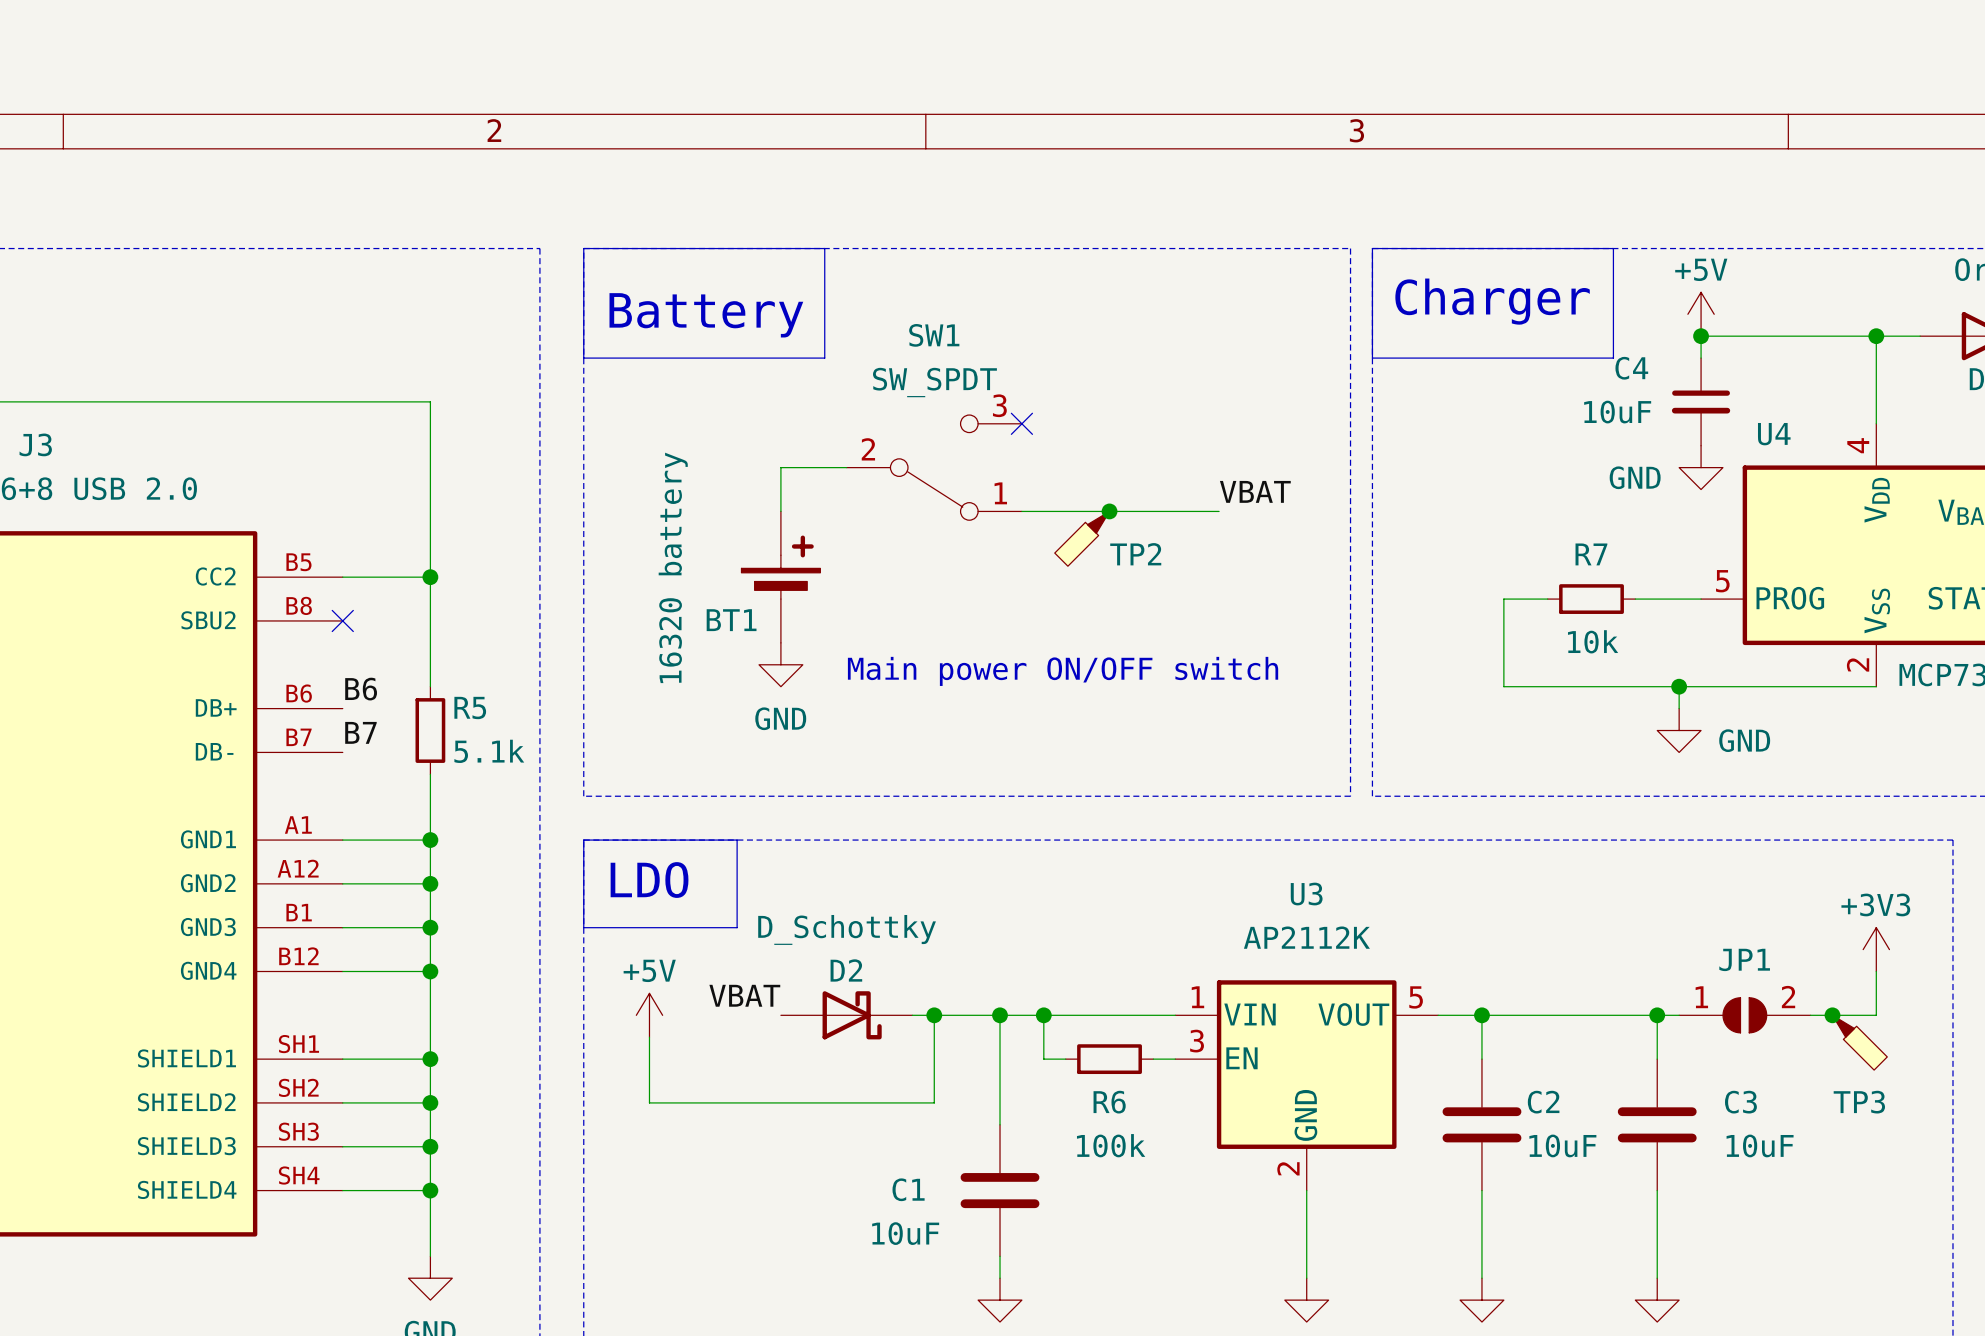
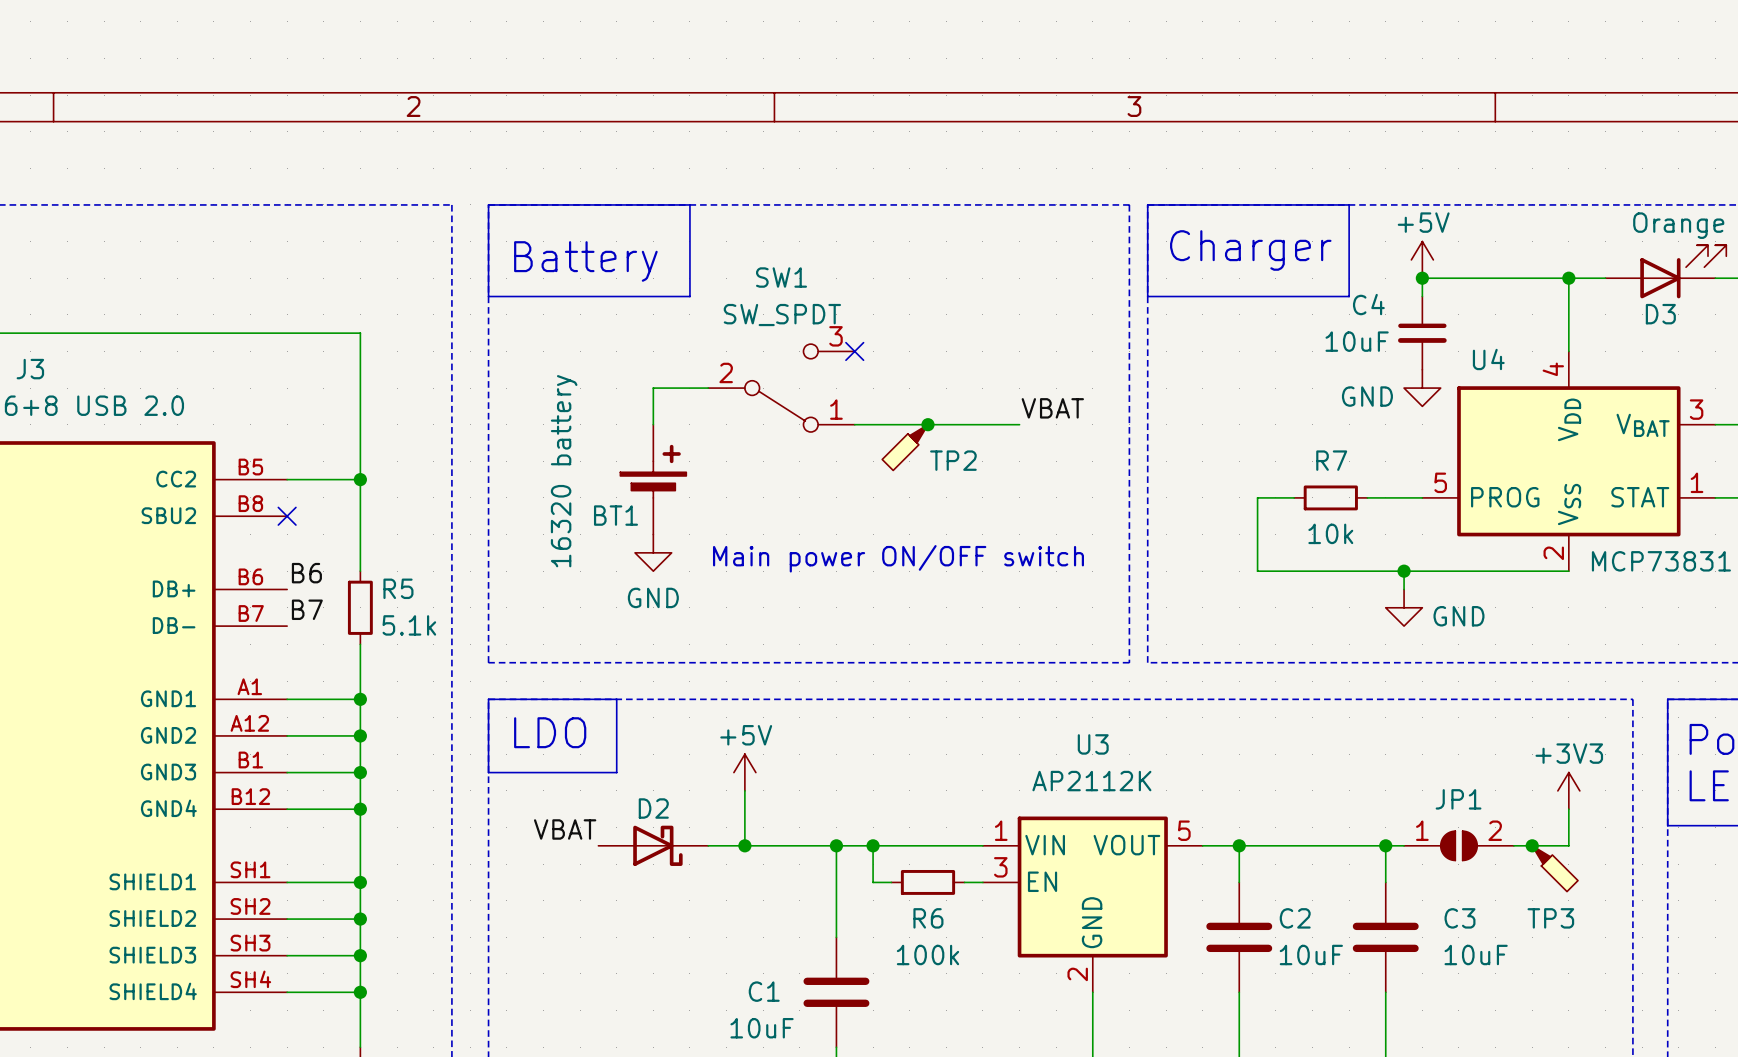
D2 value: D_Schottky (847, 929) -> none
wire: none -> (744, 790) (744, 845)
label position: VBAT (744, 995) -> VBAT (565, 829)
power symbol position: +5V (649, 1015) -> +5V (744, 772)
D2 position: (846, 1015) -> (653, 845)
wire: (934, 1015) (934, 1102) (649, 1102) (649, 1037) -> none
junction position: (934, 1015) -> (744, 845)

